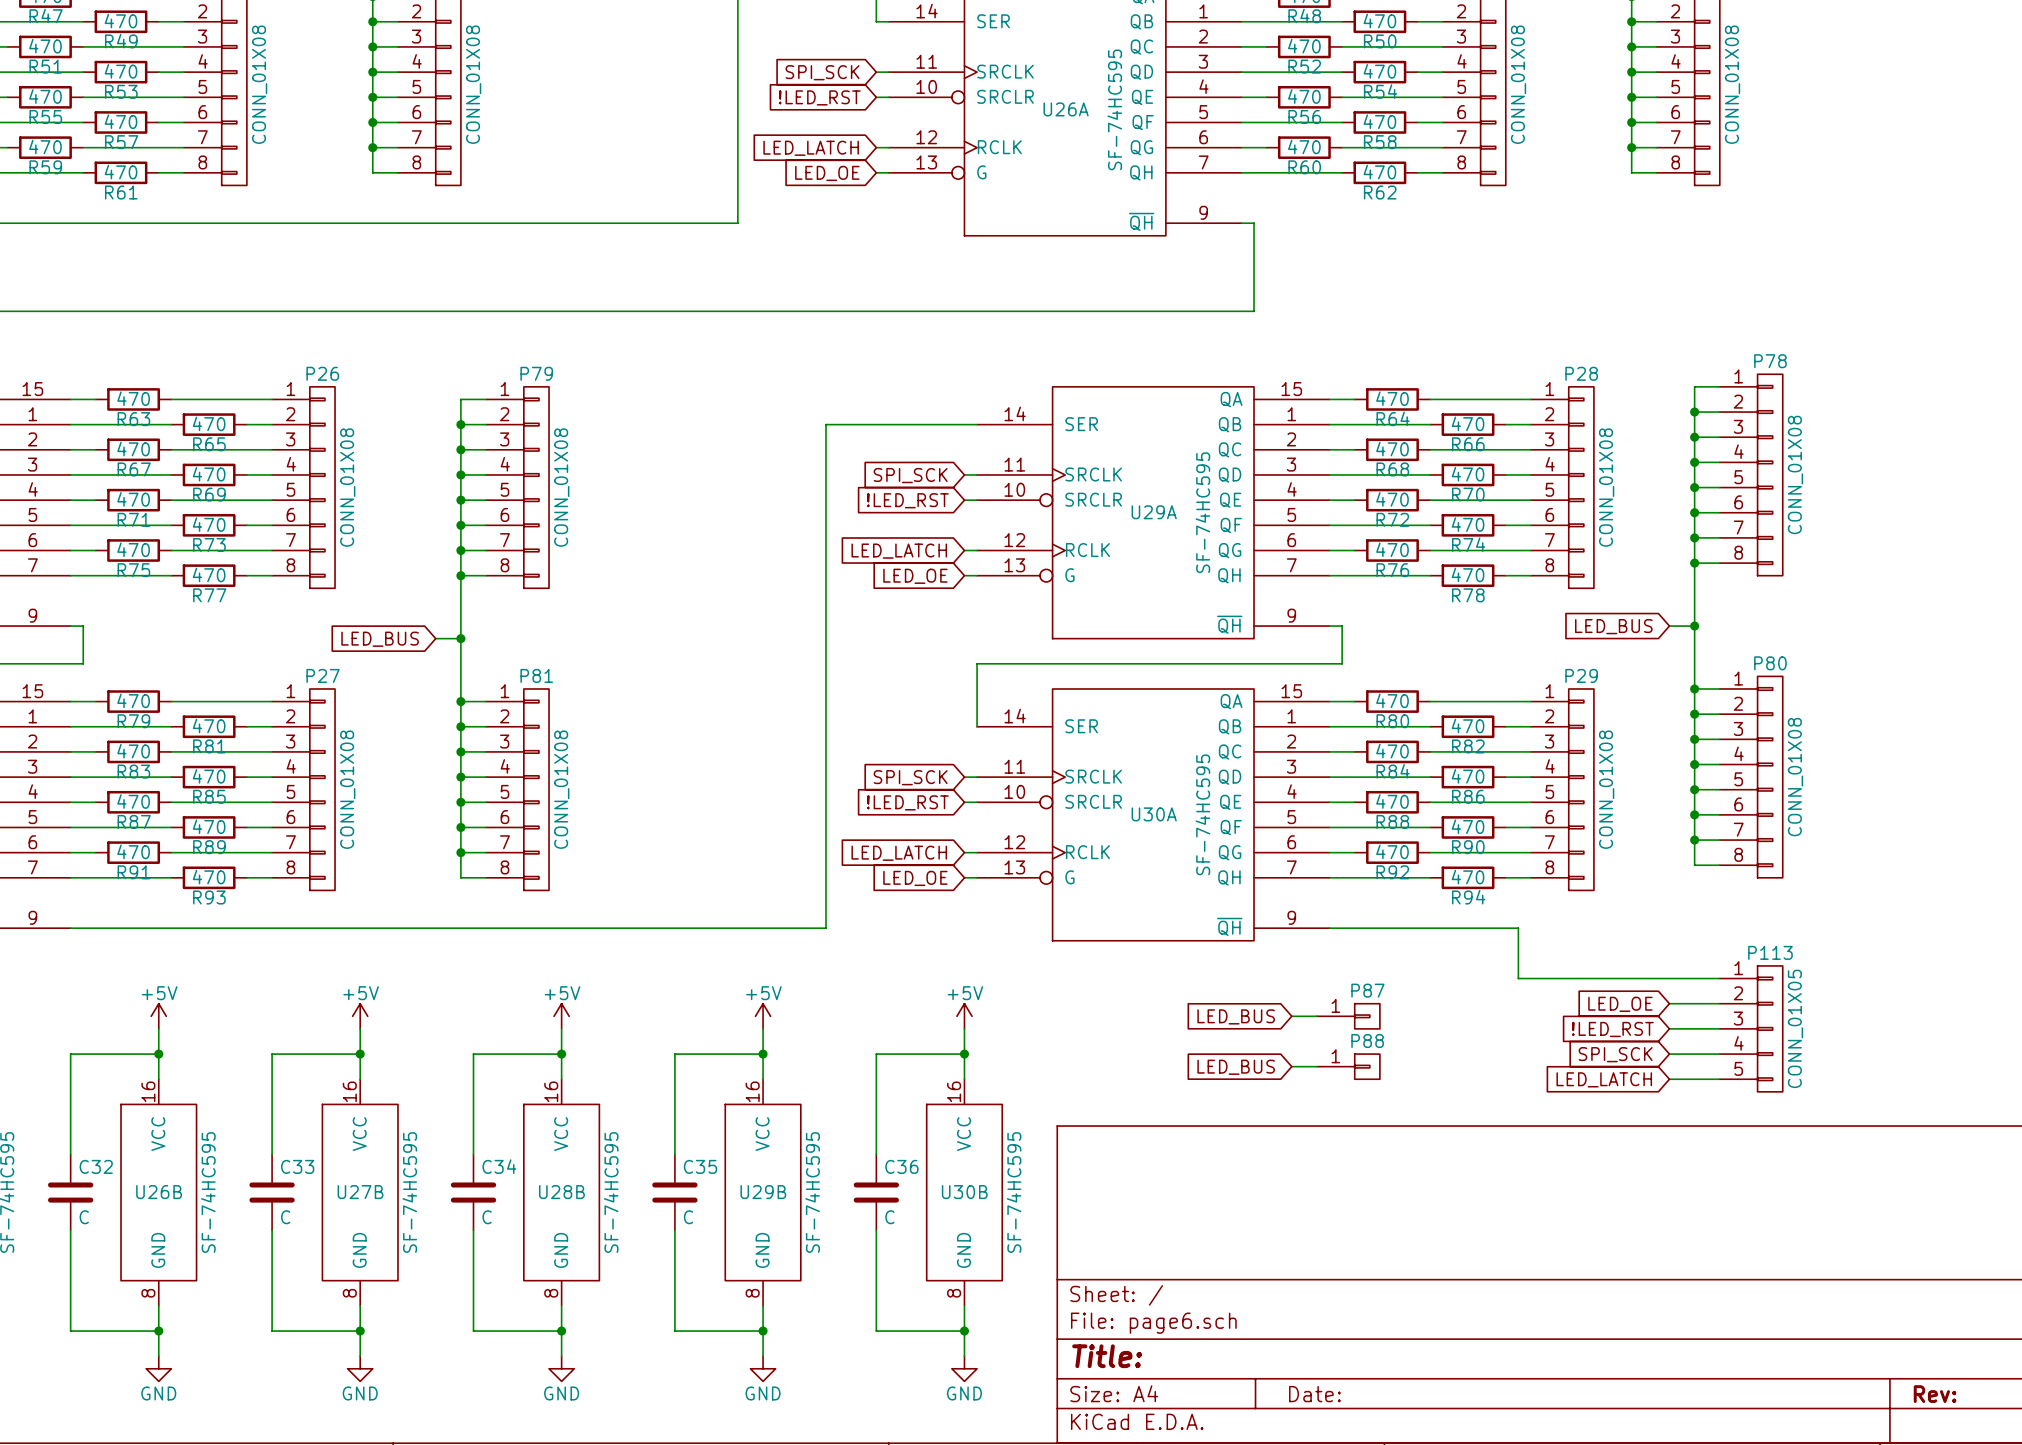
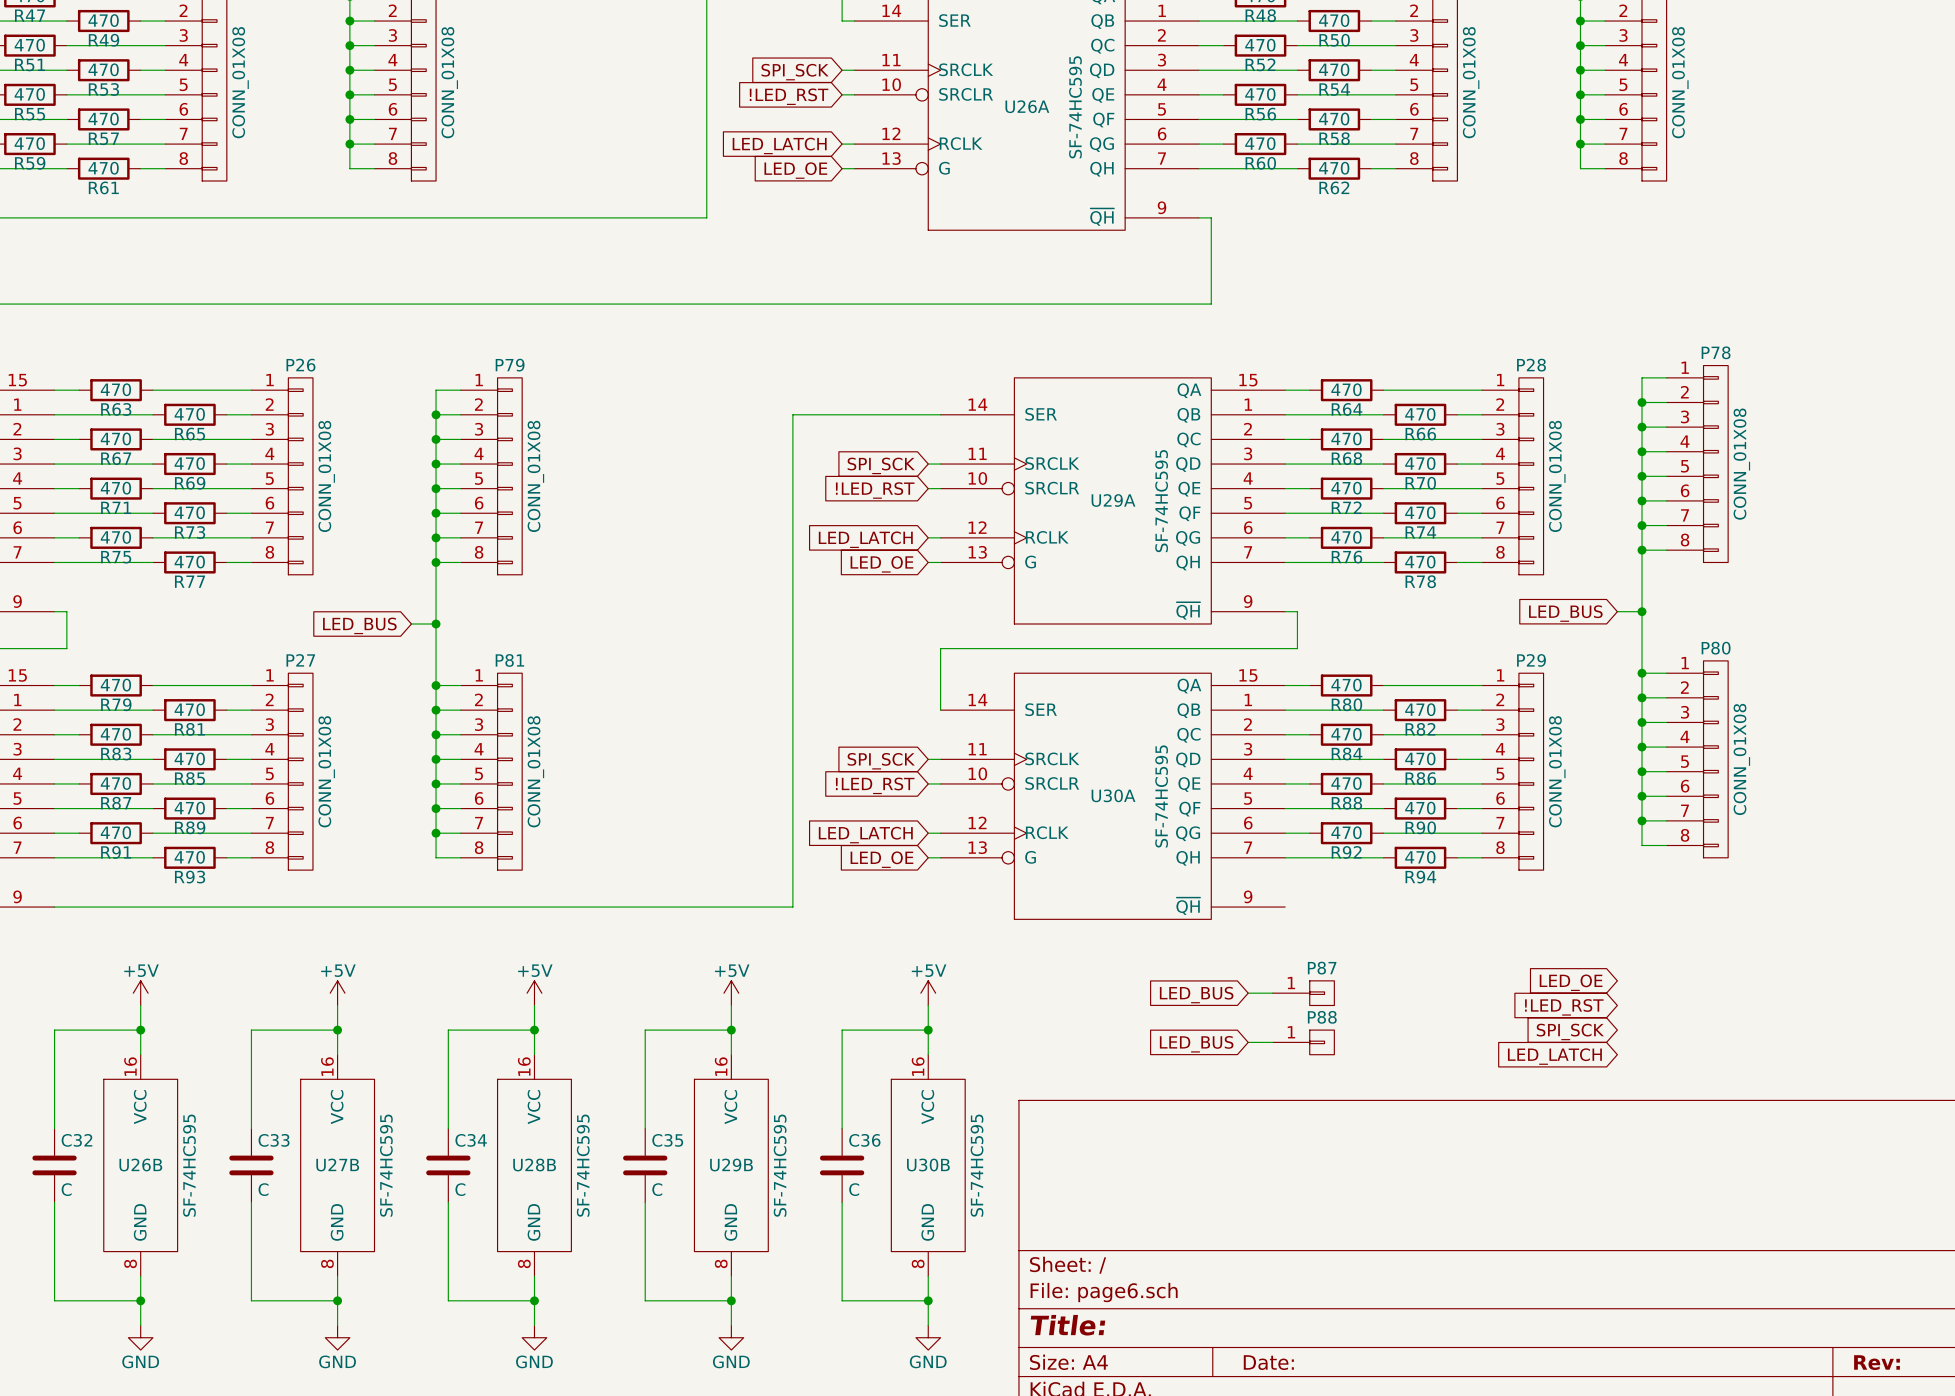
wire: (1329, 928) (1518, 928) (1518, 978) (1719, 978) -> none
wire: (1669, 1003) (1719, 1003) -> none
wire: (1669, 1028) (1719, 1028) -> none
P113: CONN_01X05 (1751, 1028) -> none
wire: (1669, 1054) (1719, 1054) -> none
wire: (1669, 1079) (1719, 1079) -> none

